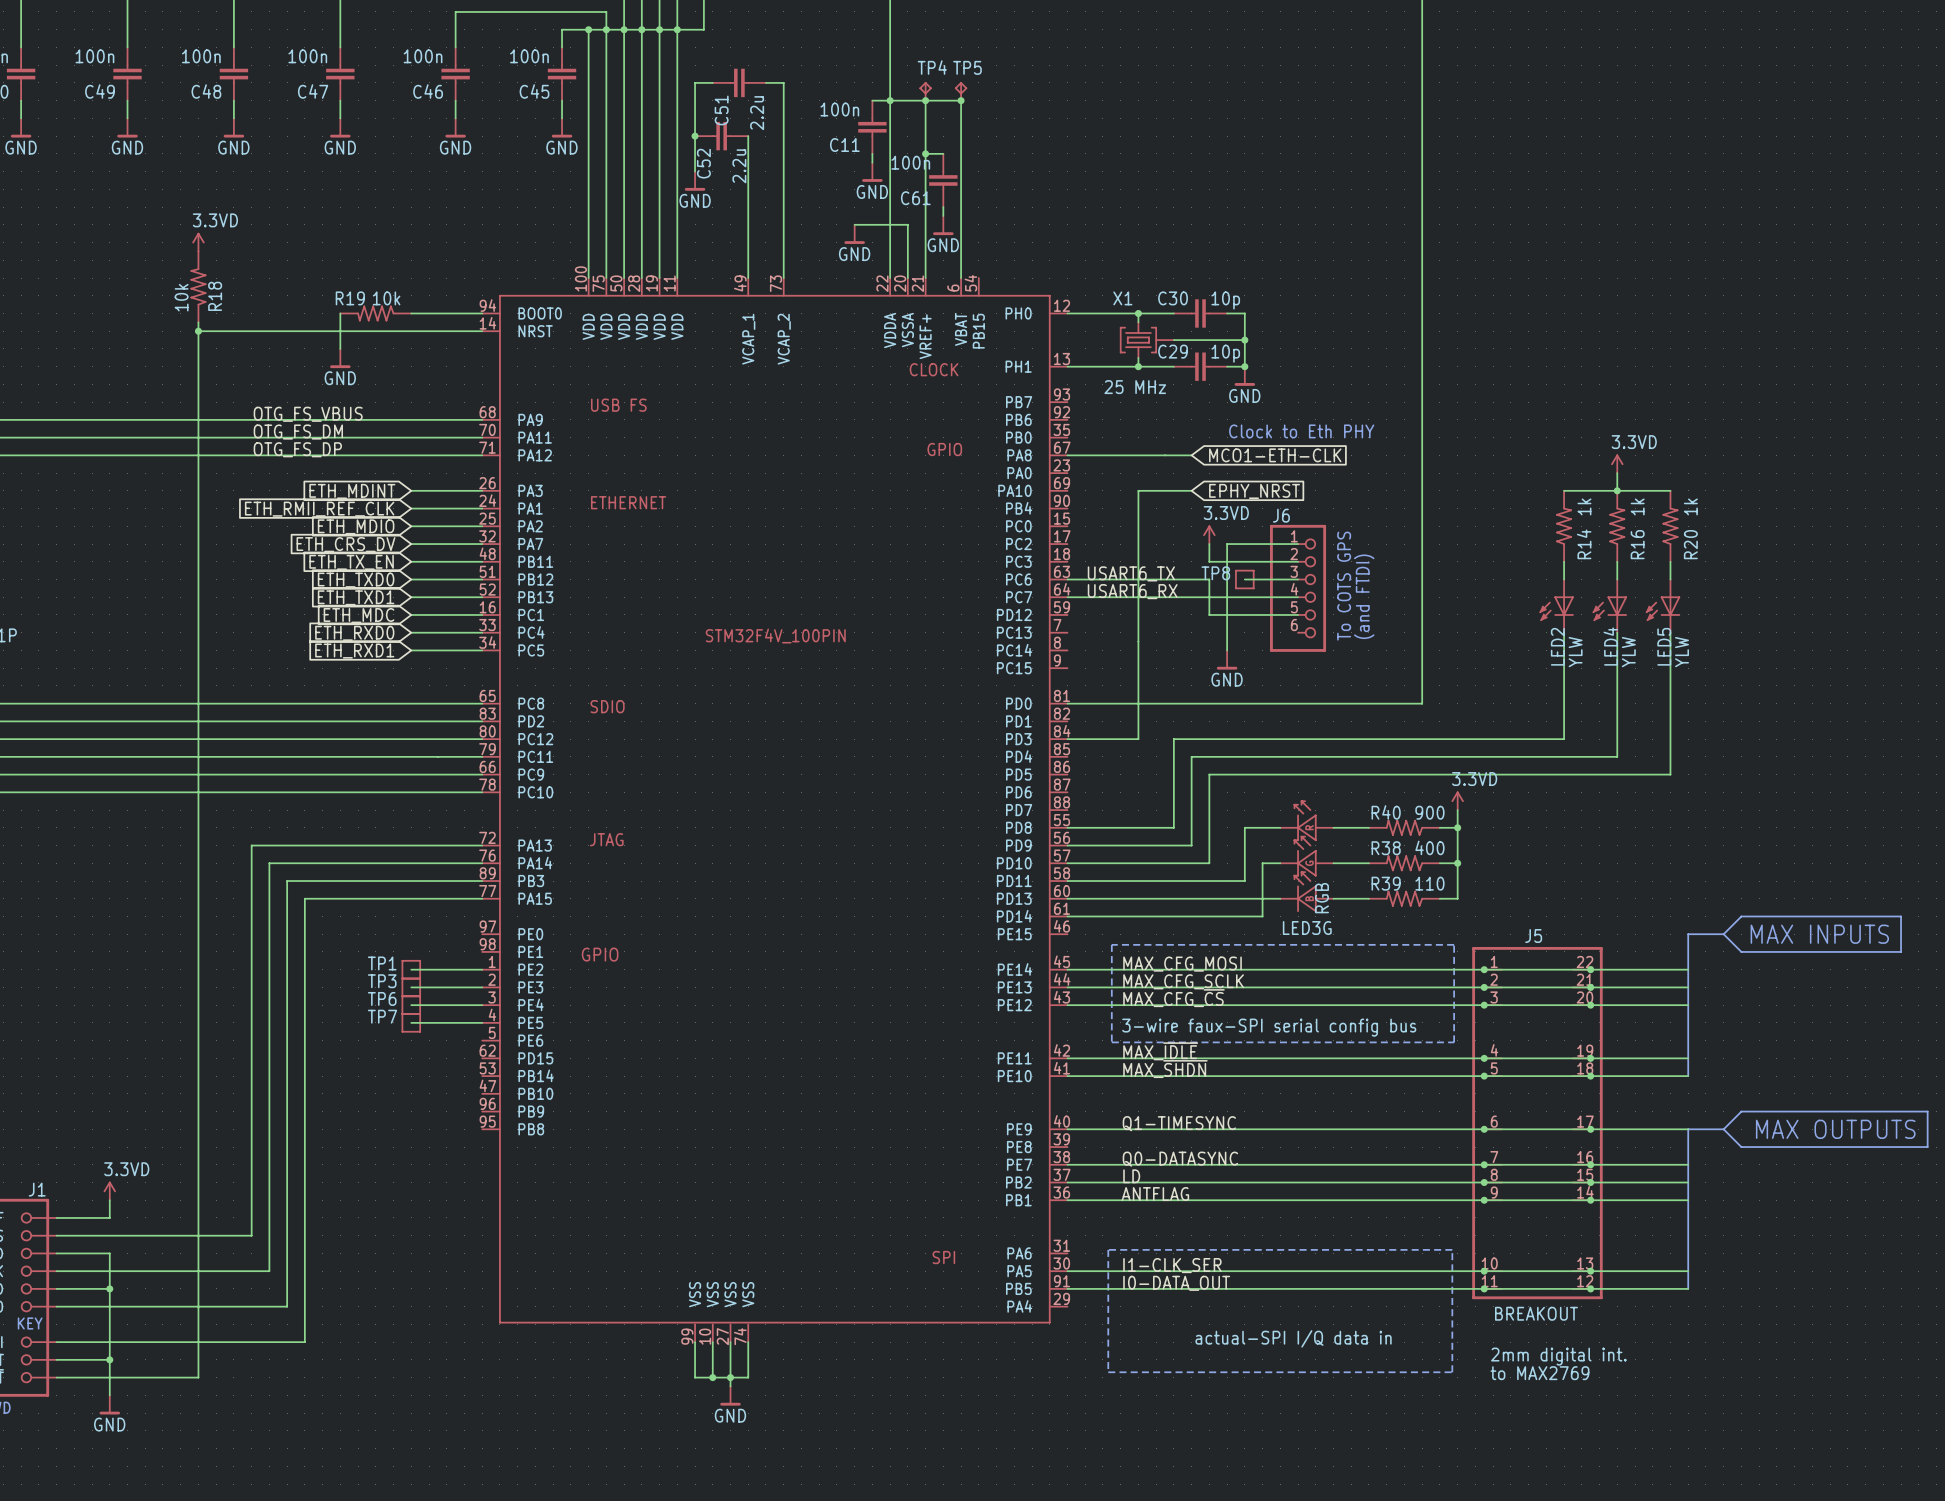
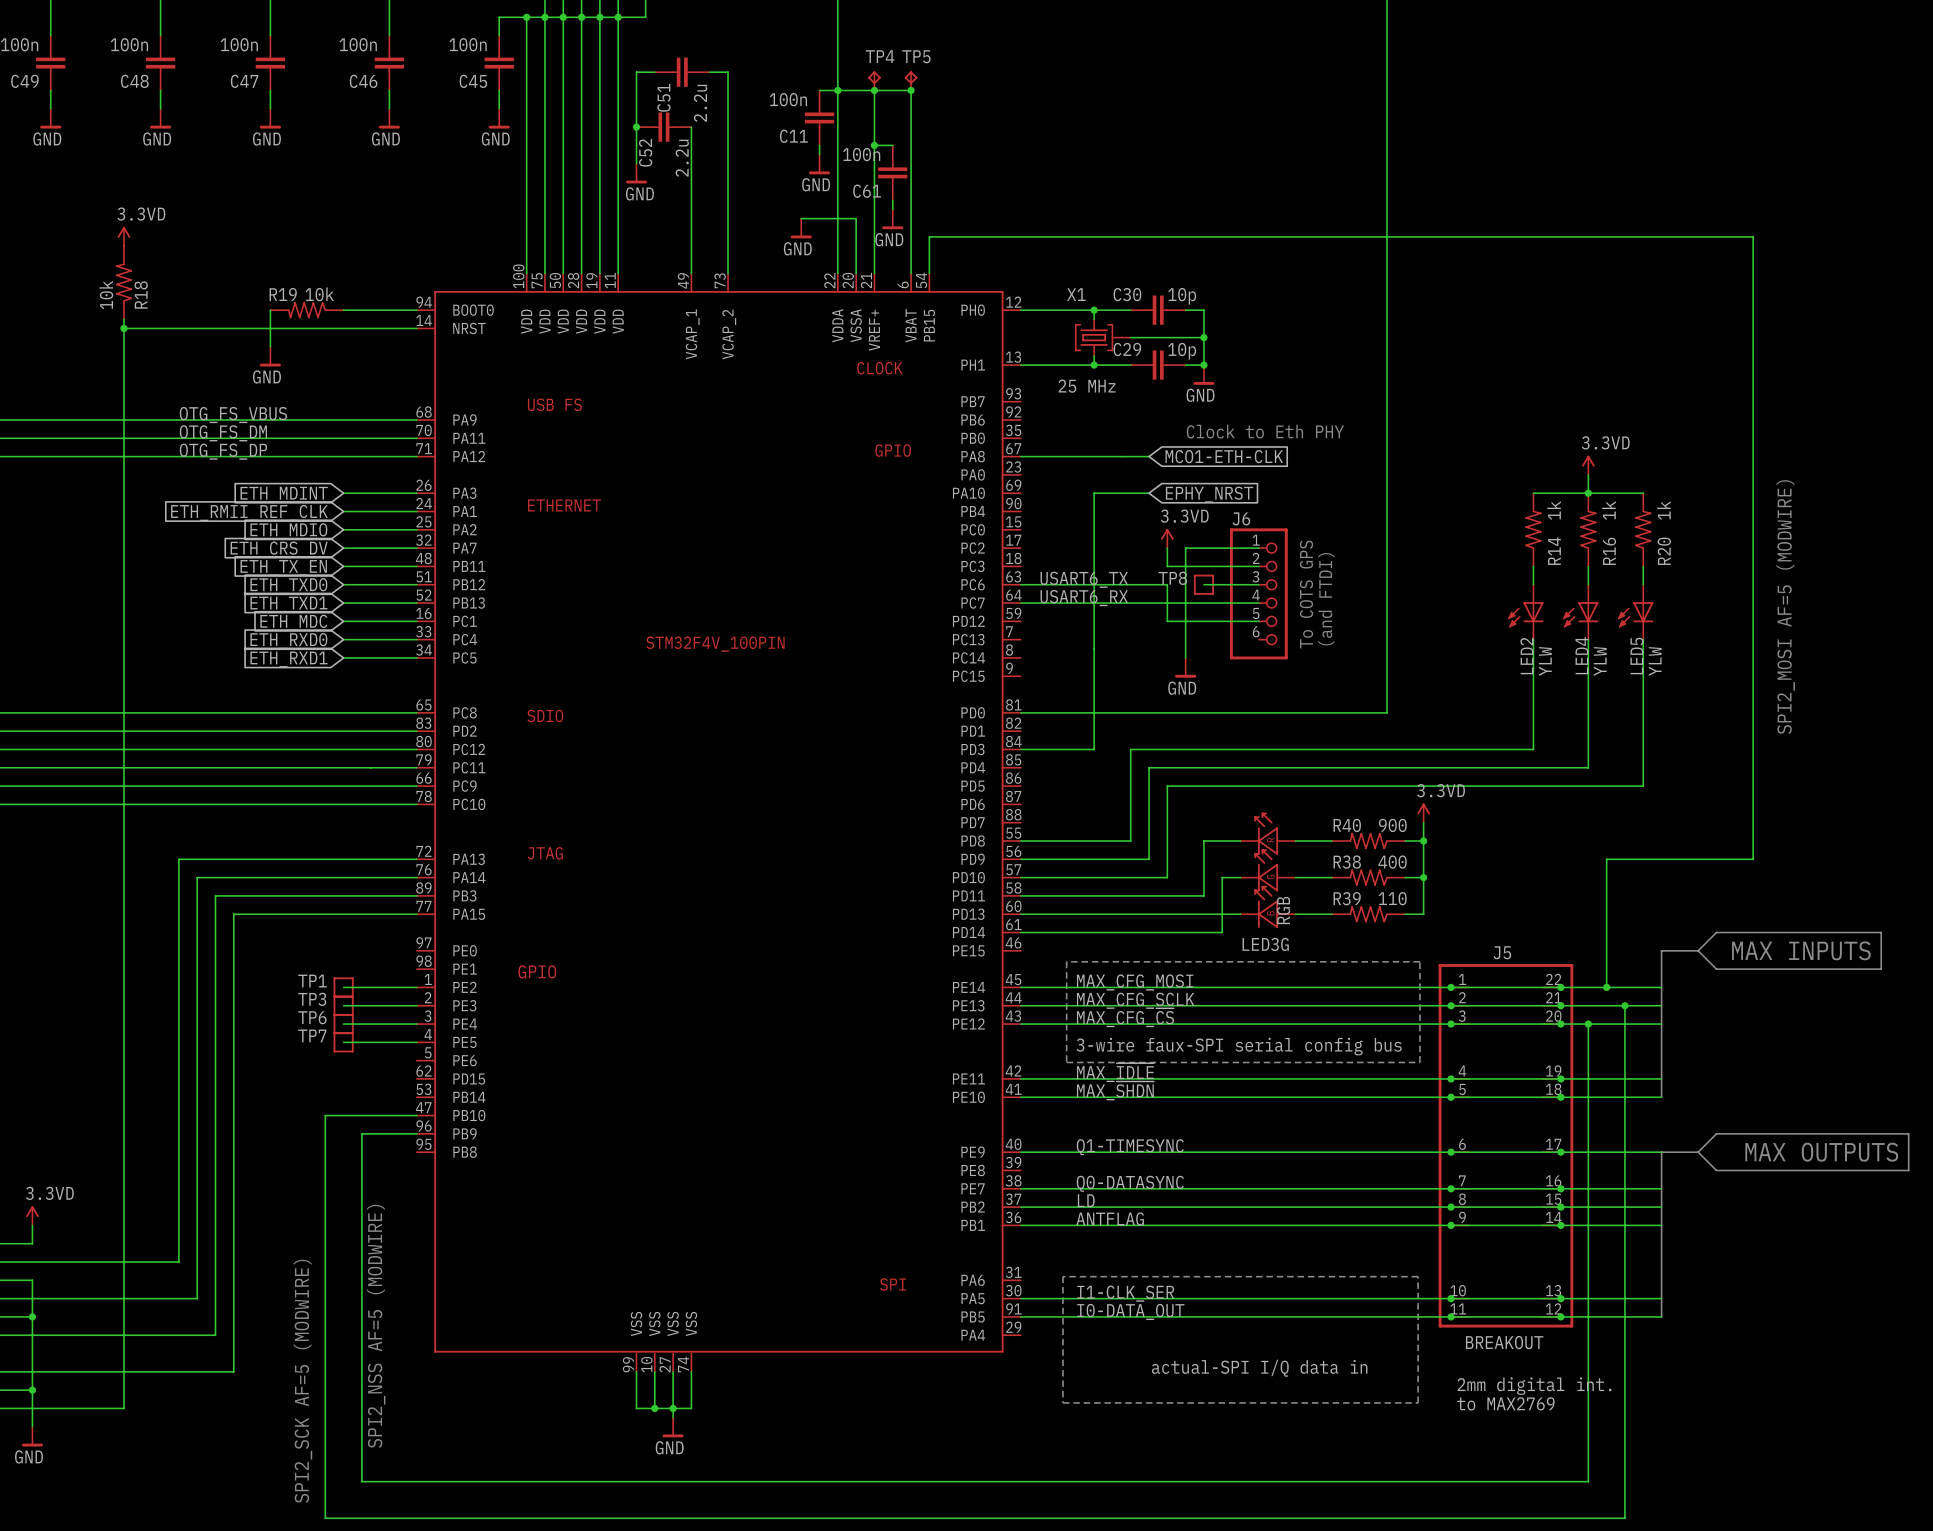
wire: none -> (929, 273) (929, 236) (1753, 236) (1753, 859) (1606, 859) (1606, 987)
text: none -> SPI2_MOSI AF=5 (MODWIRE) (1785, 607)
junction: none -> (1606, 987)
wire: none -> (1624, 1005) (1624, 1518) (325, 1518) (325, 1115) (416, 1115)
junction: none -> (1624, 1005)
wire: none -> (1588, 1024) (1588, 1481) (361, 1481) (361, 1133) (416, 1133)
junction: none -> (1588, 1024)
text: none -> SPI2_NSS AF=5 (MODWIRE) (376, 1326)
text: none -> SPI2_SCK AF=5 (MODWIRE) (302, 1381)

